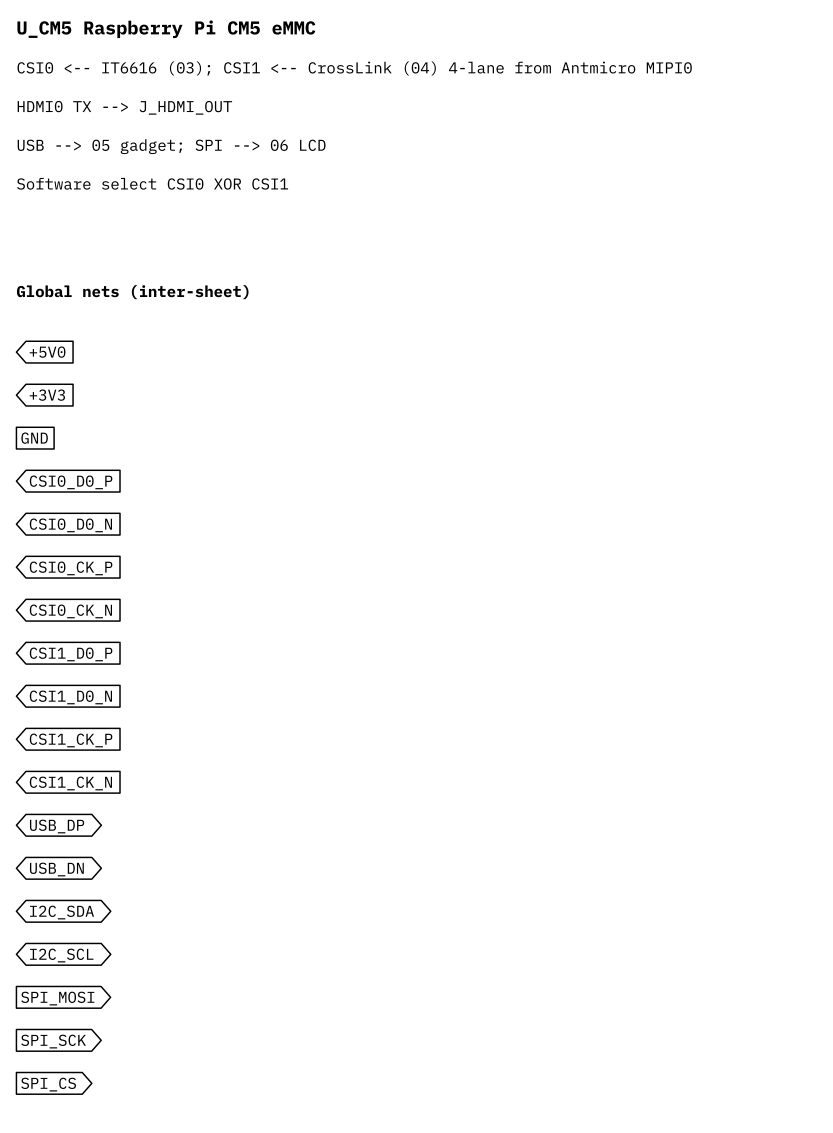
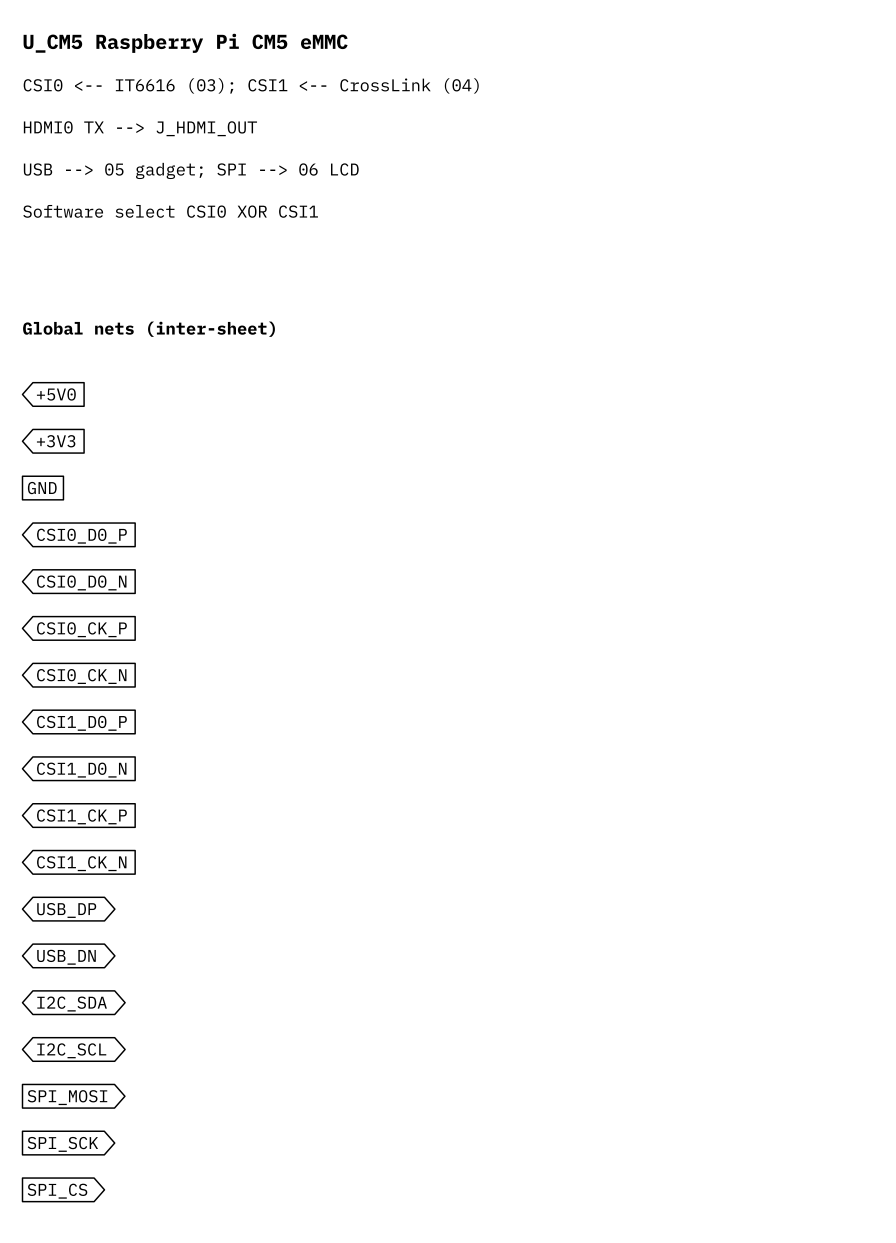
text: CSI0 <-- IT6616 (03); CSI1 <-- CrossLink (04) 4-lane from Antmicro MIPI0 (354, 68) -> CSI0 <-- IT6616 (03); CSI1 <-- CrossLink (04) (251, 85)

